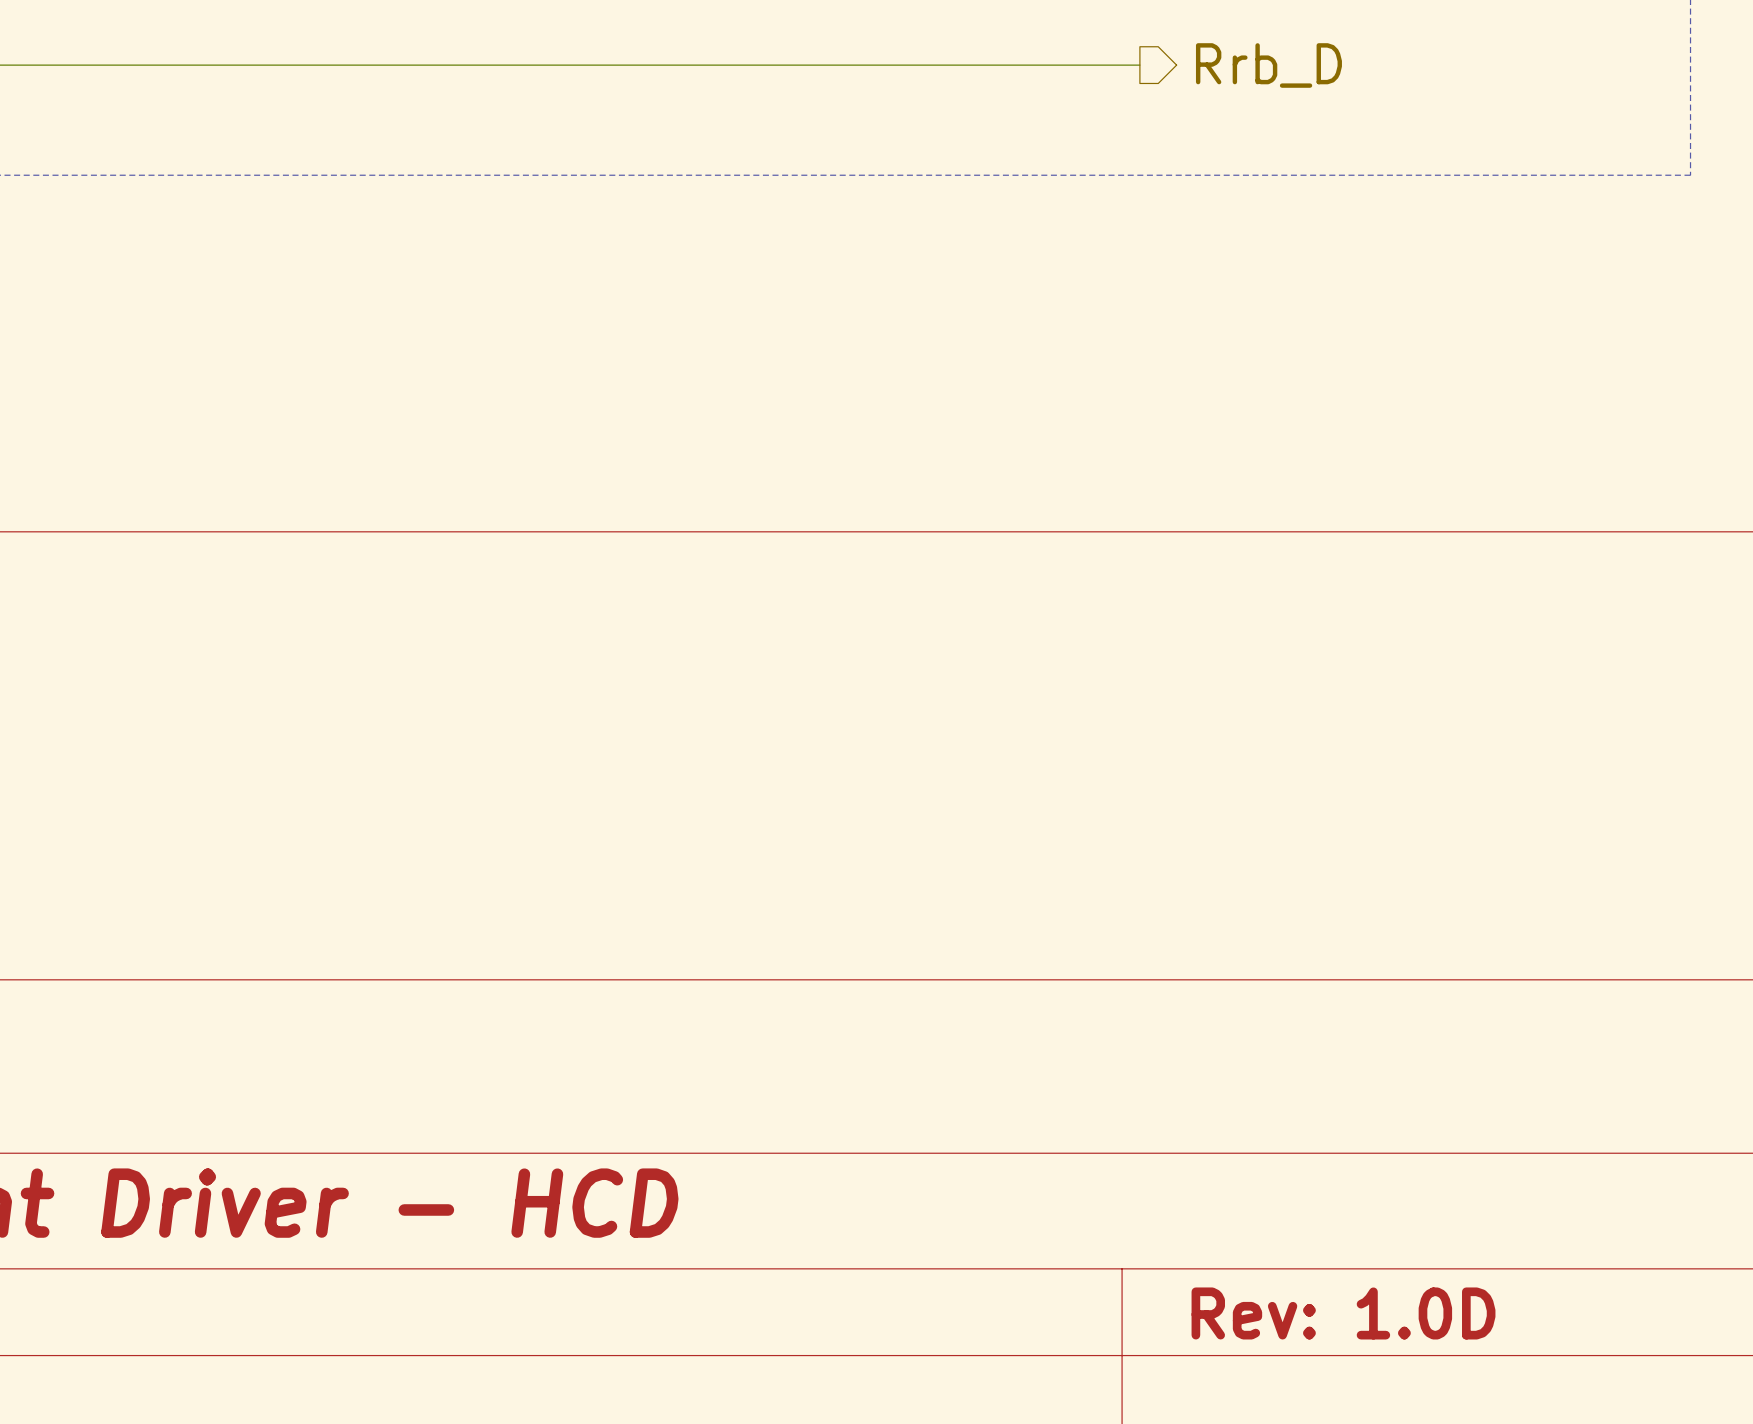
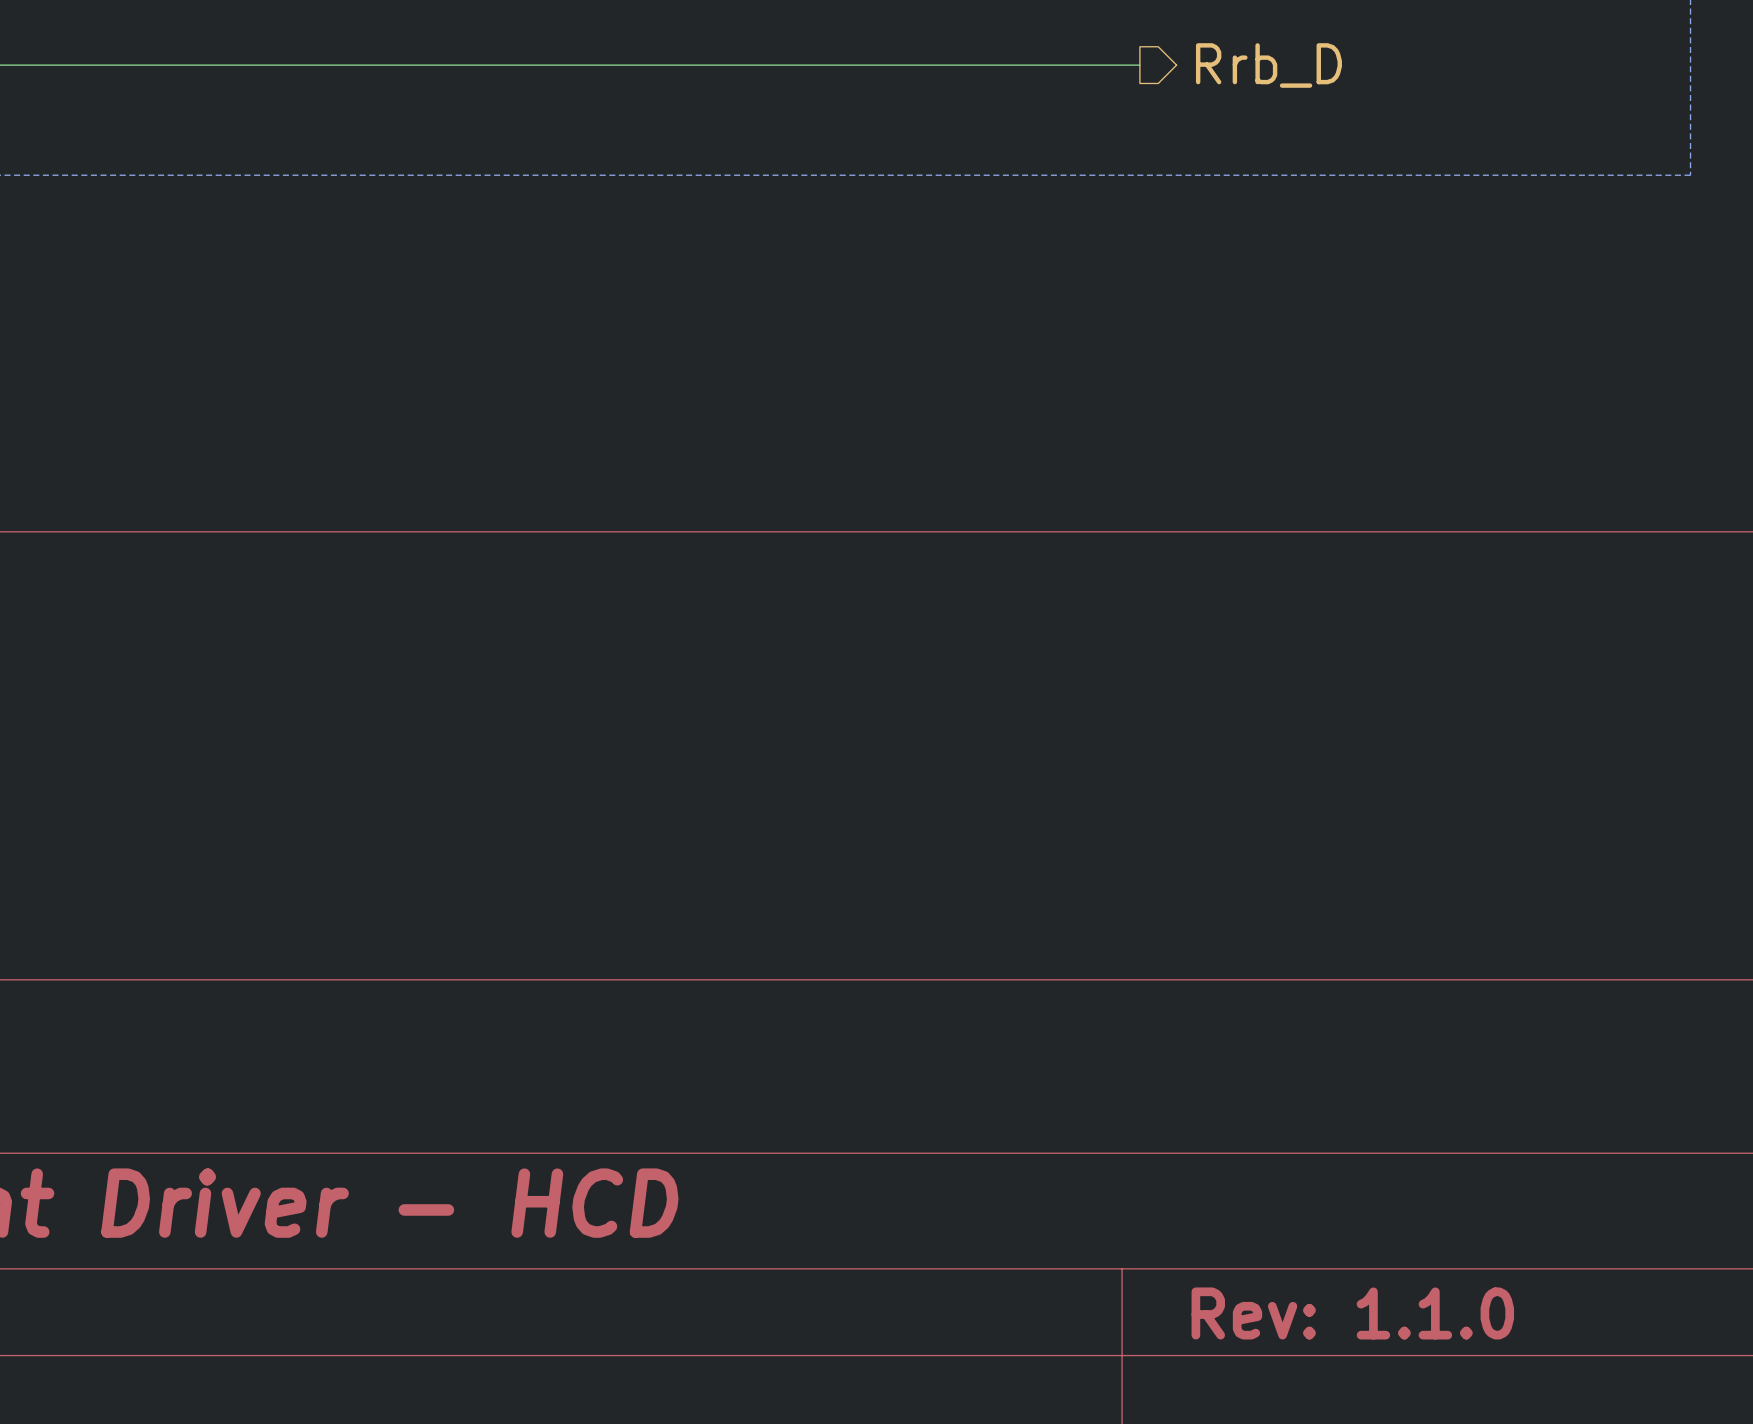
title block: Rev: 1.0D (1343, 1313) -> Rev: 1.1.0 (1352, 1313)

